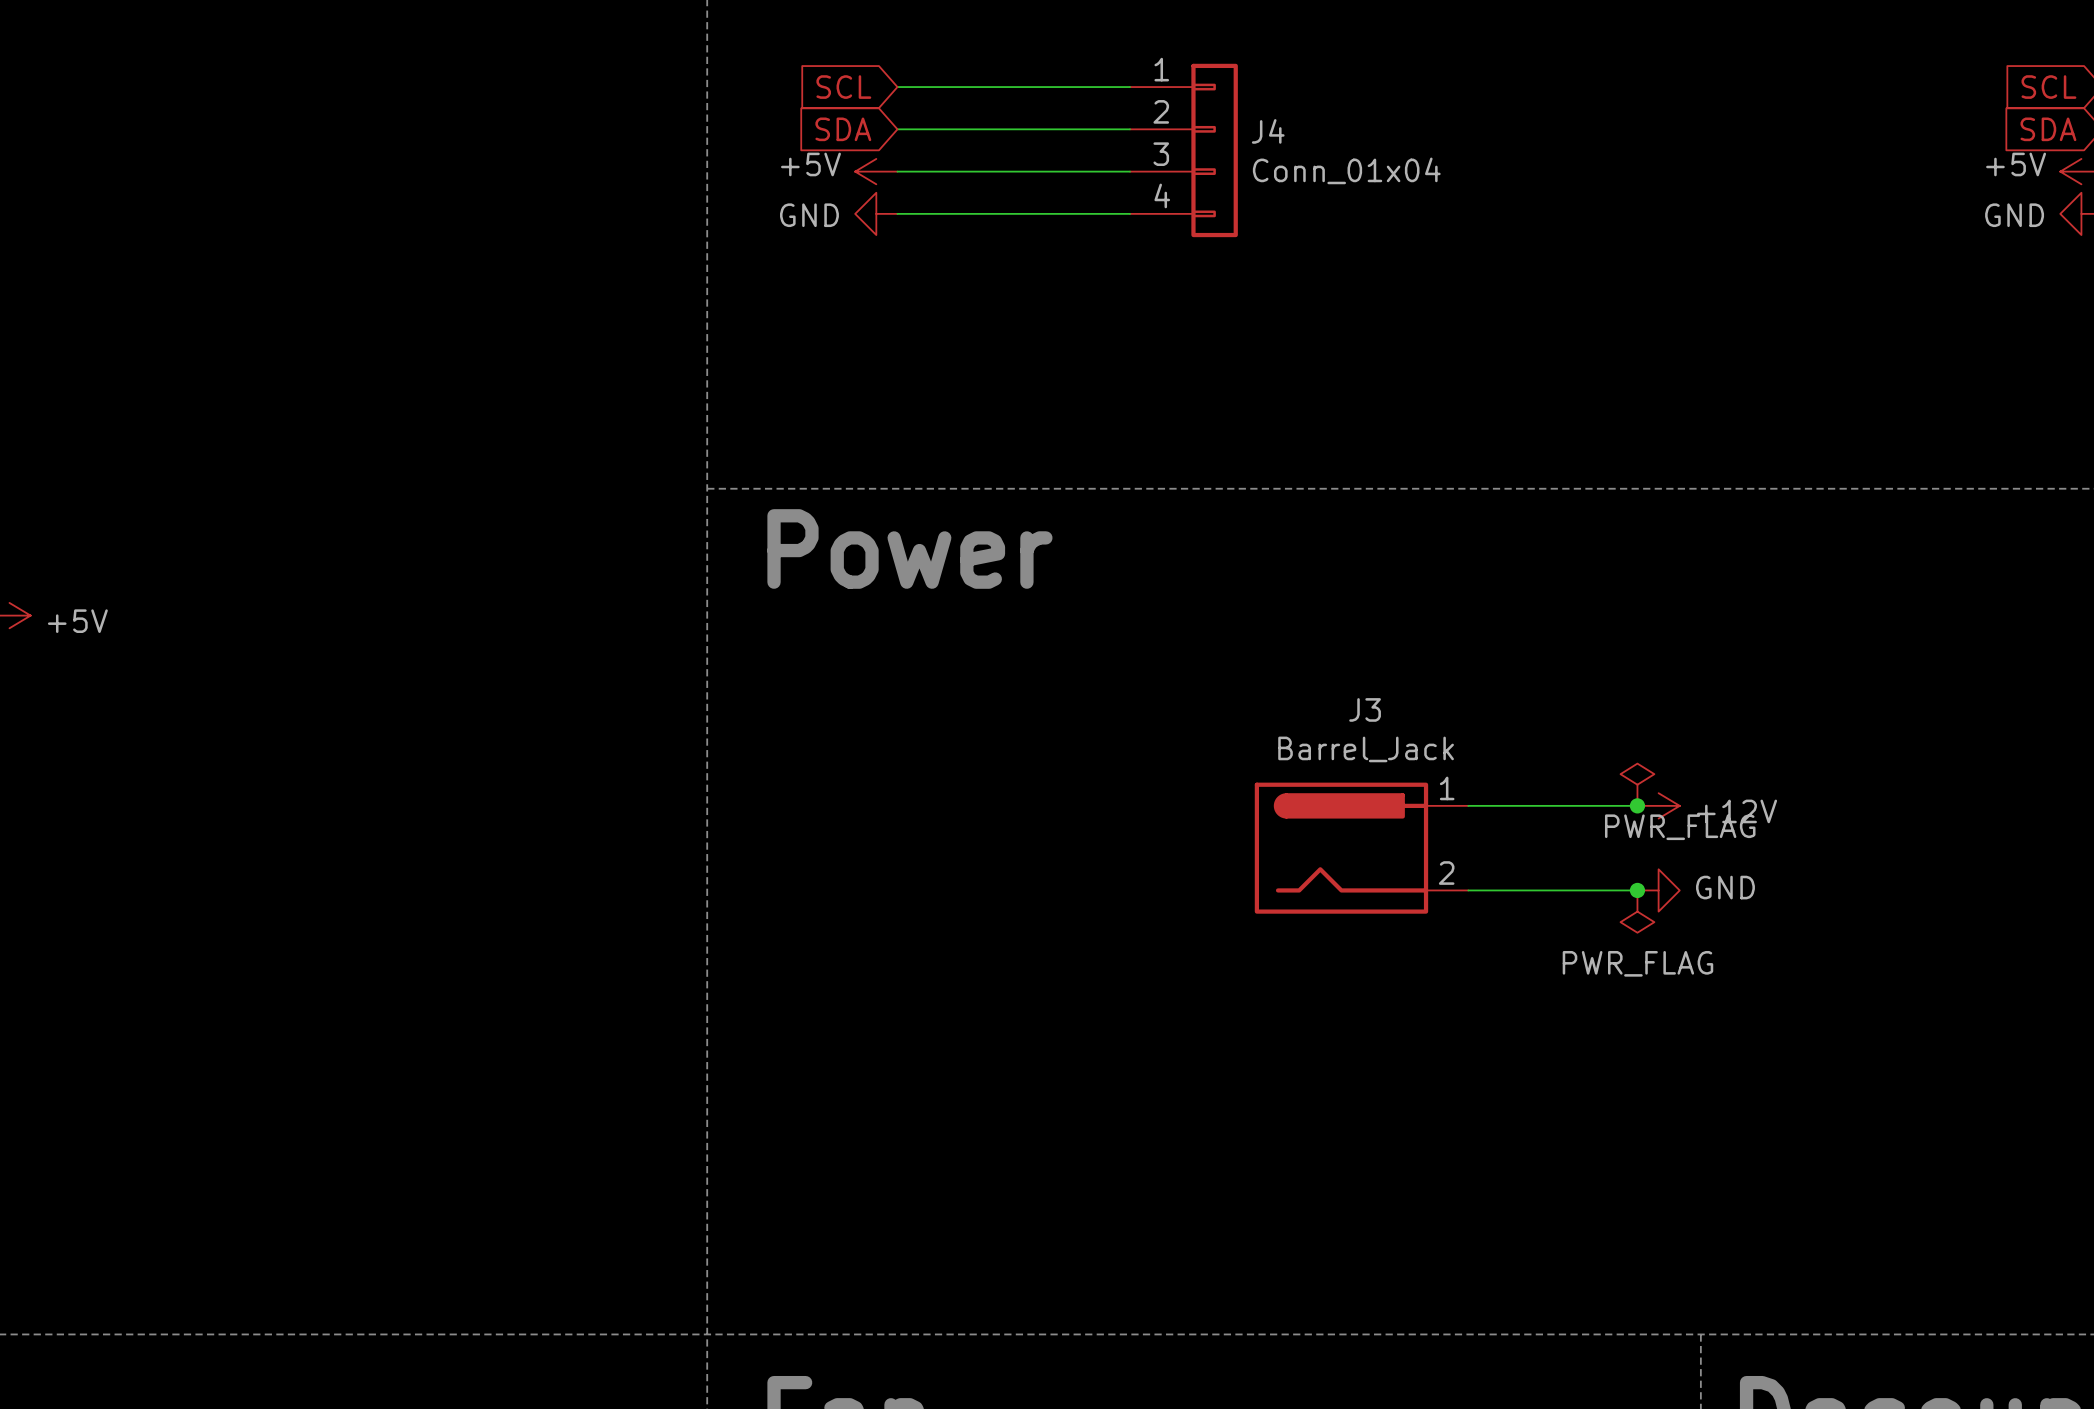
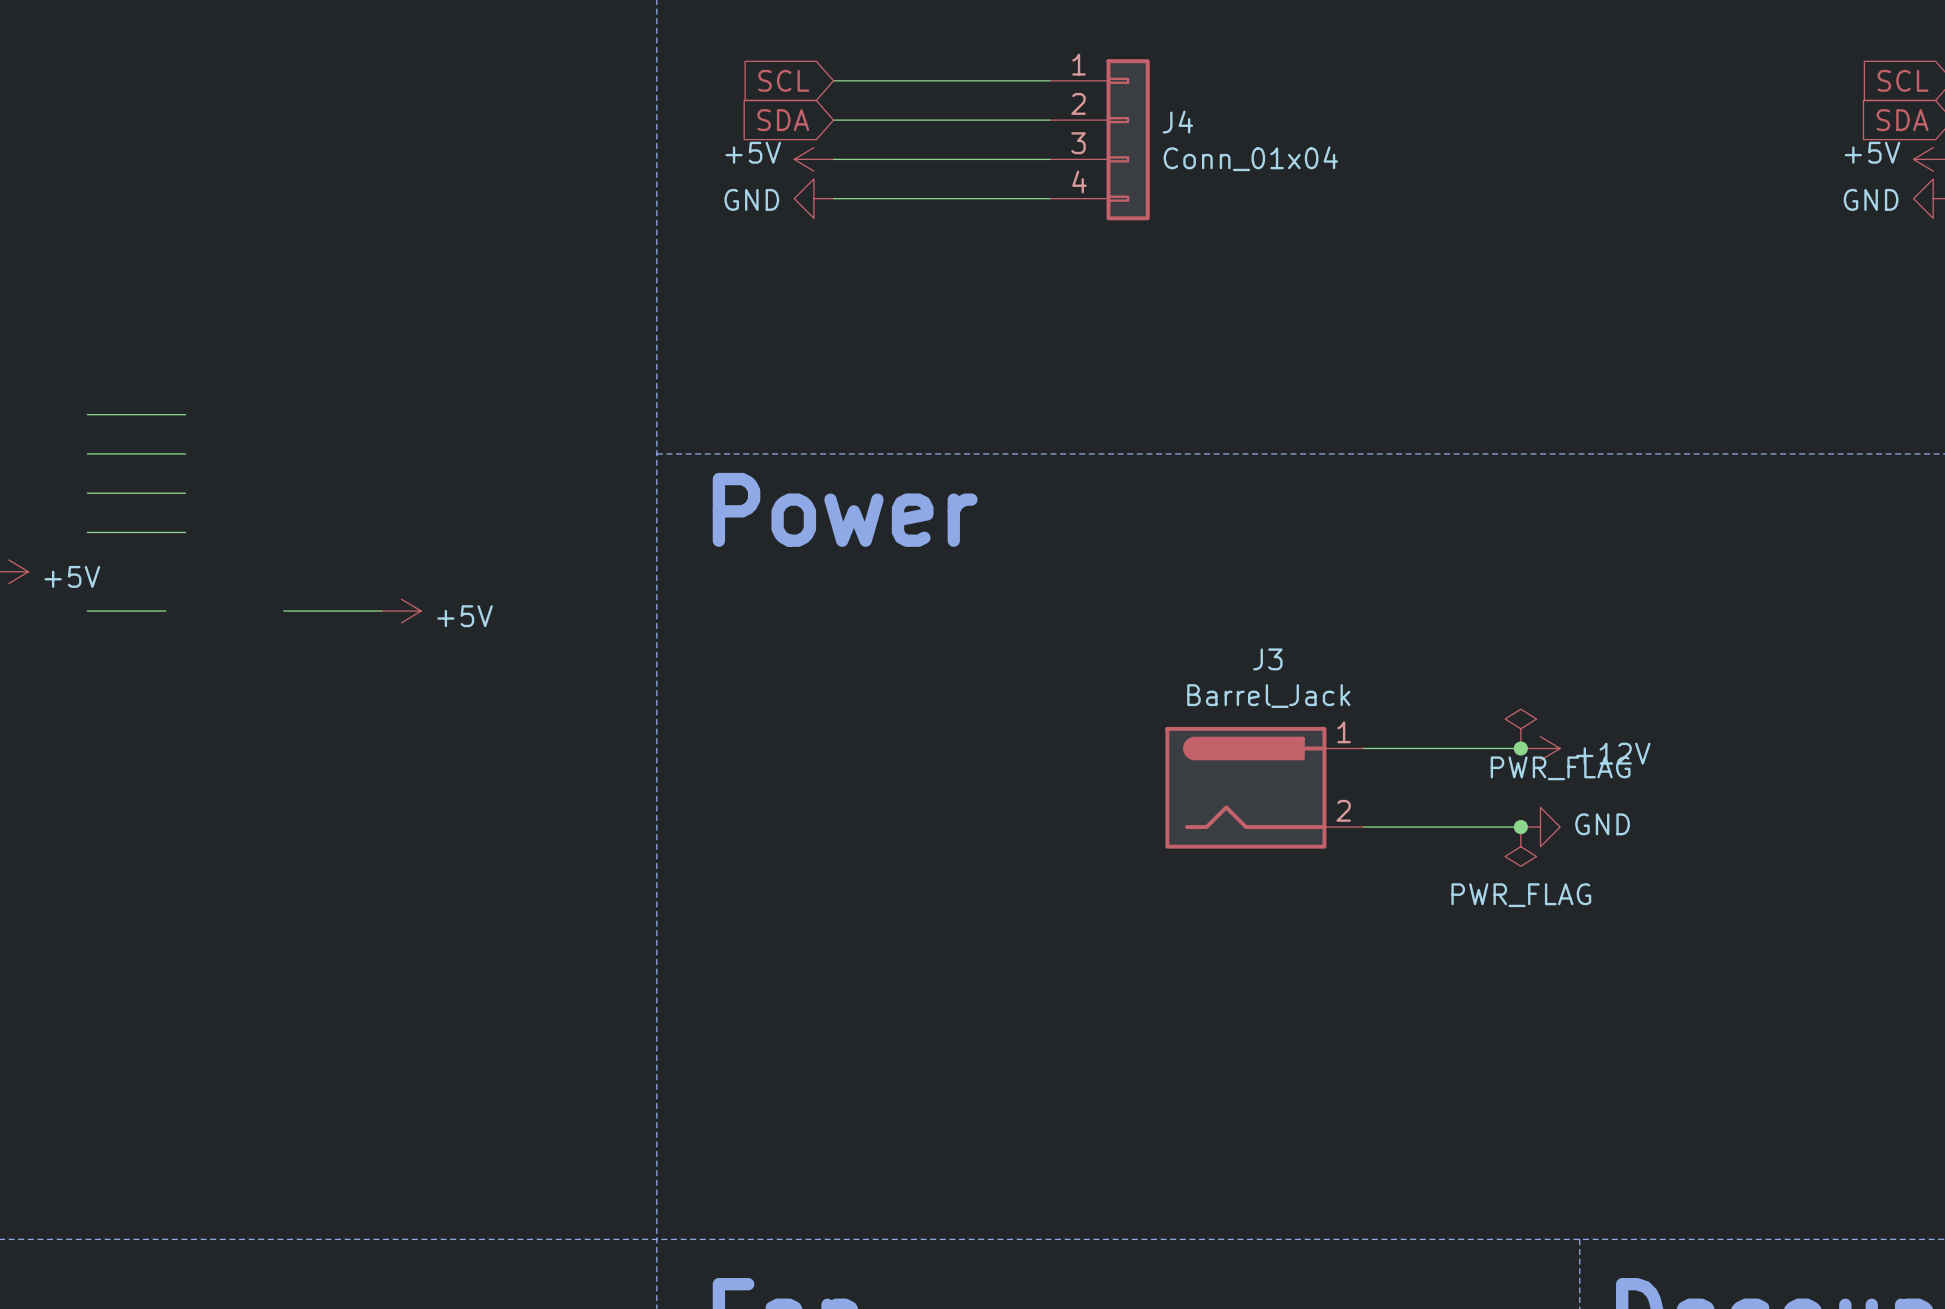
wire: none -> (87, 414) (185, 414)
wire: none -> (87, 453) (185, 453)
wire: none -> (87, 493) (185, 493)
wire: none -> (87, 532) (185, 532)
wire: none -> (87, 611) (165, 611)
wire: none -> (283, 611) (381, 611)
power symbol: none -> +5V (401, 611)

